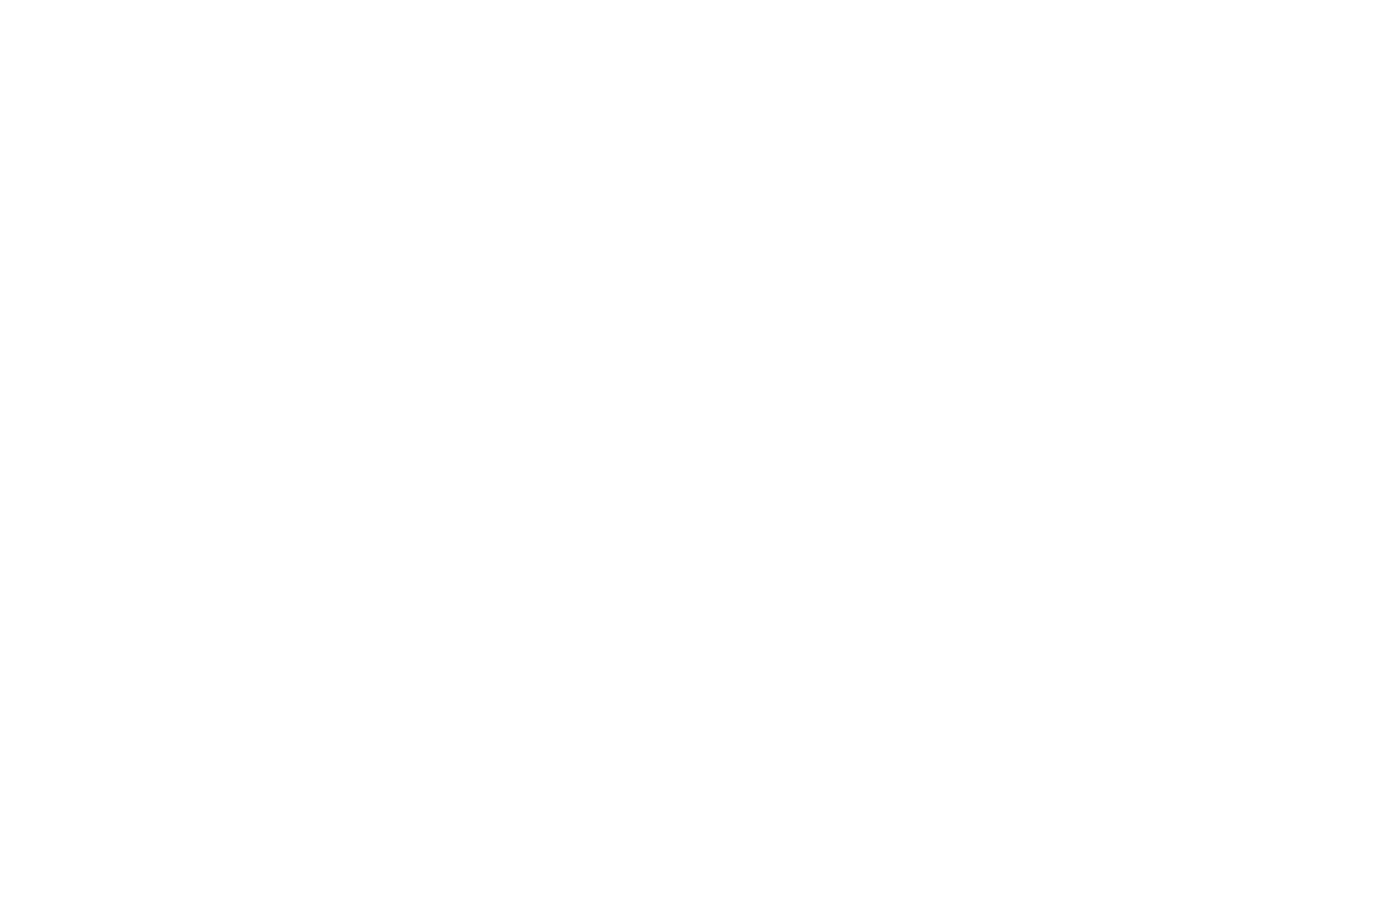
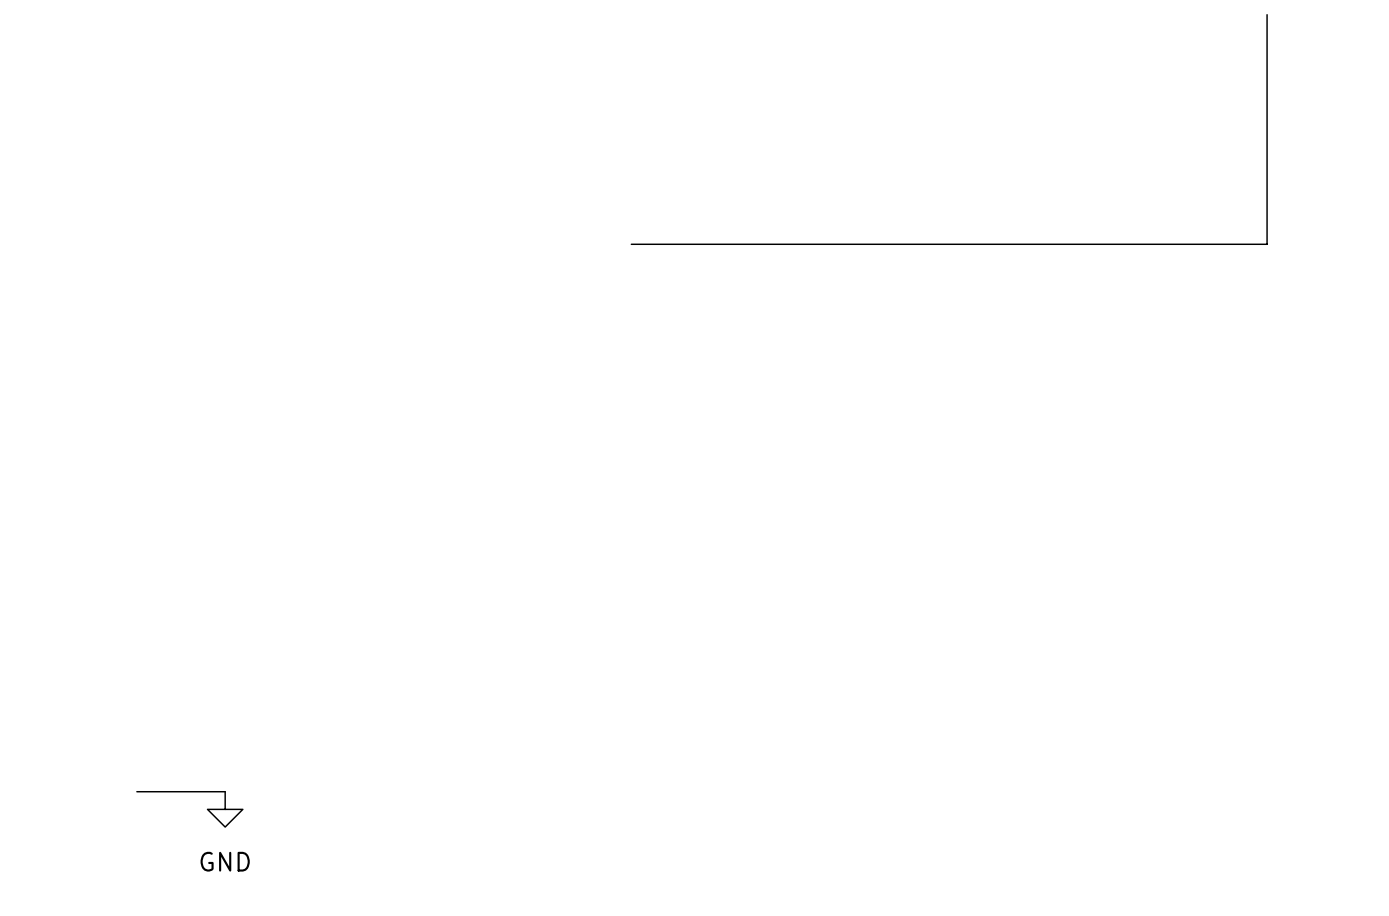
wire: none -> (1267, 14) (1267, 244) (631, 244)
wire: none -> (136, 791) (225, 791)
power symbol: none -> GND (225, 809)

